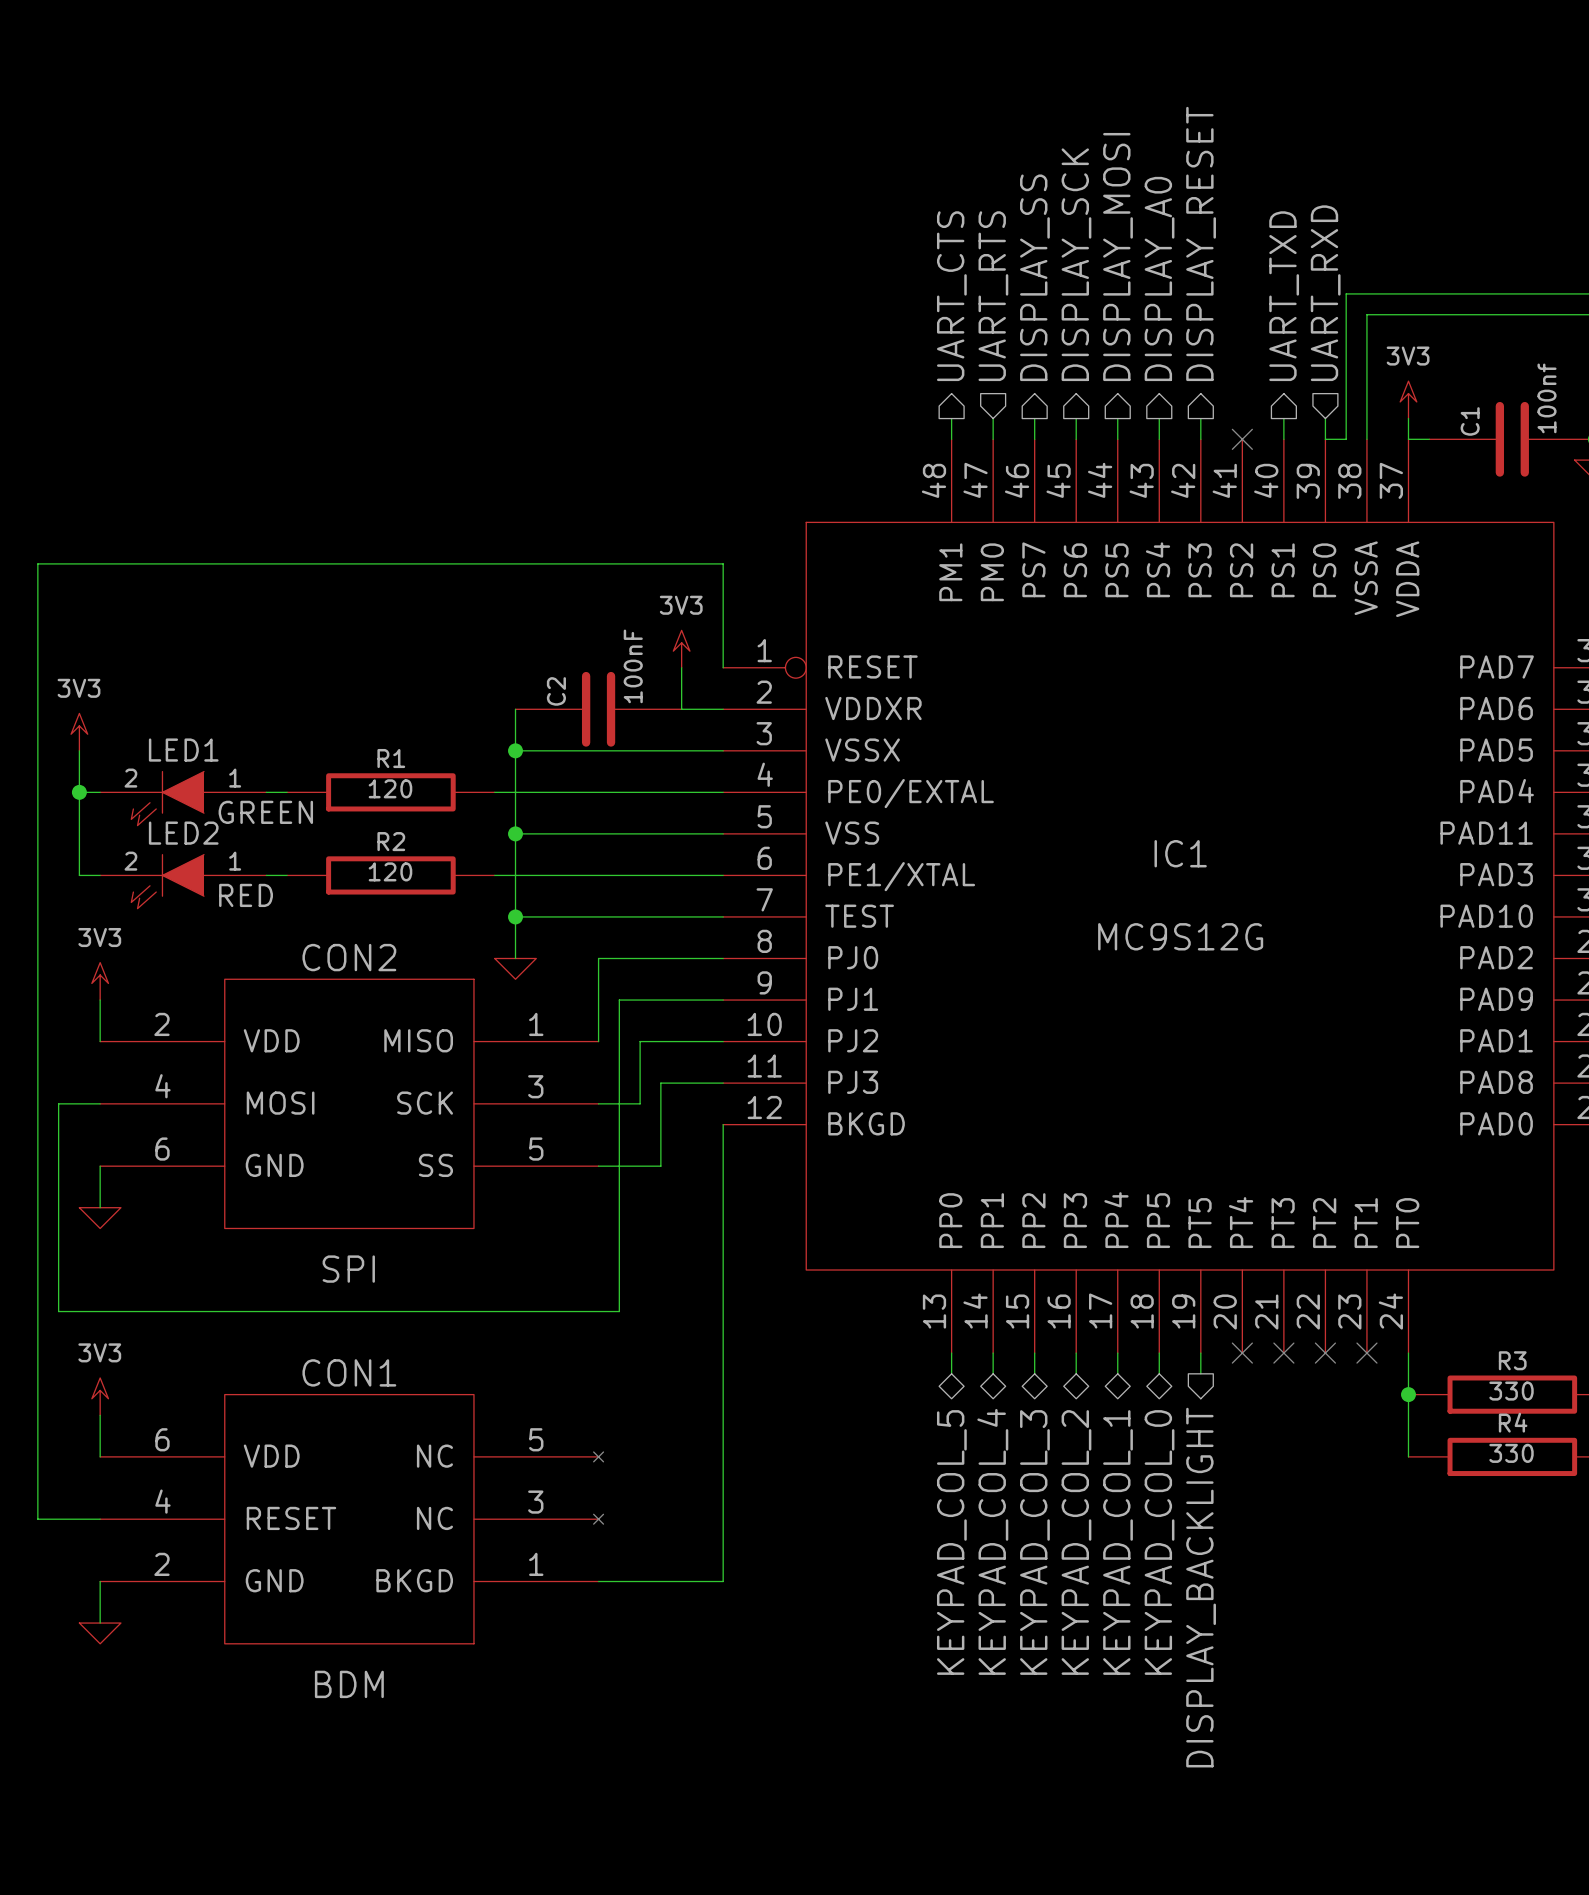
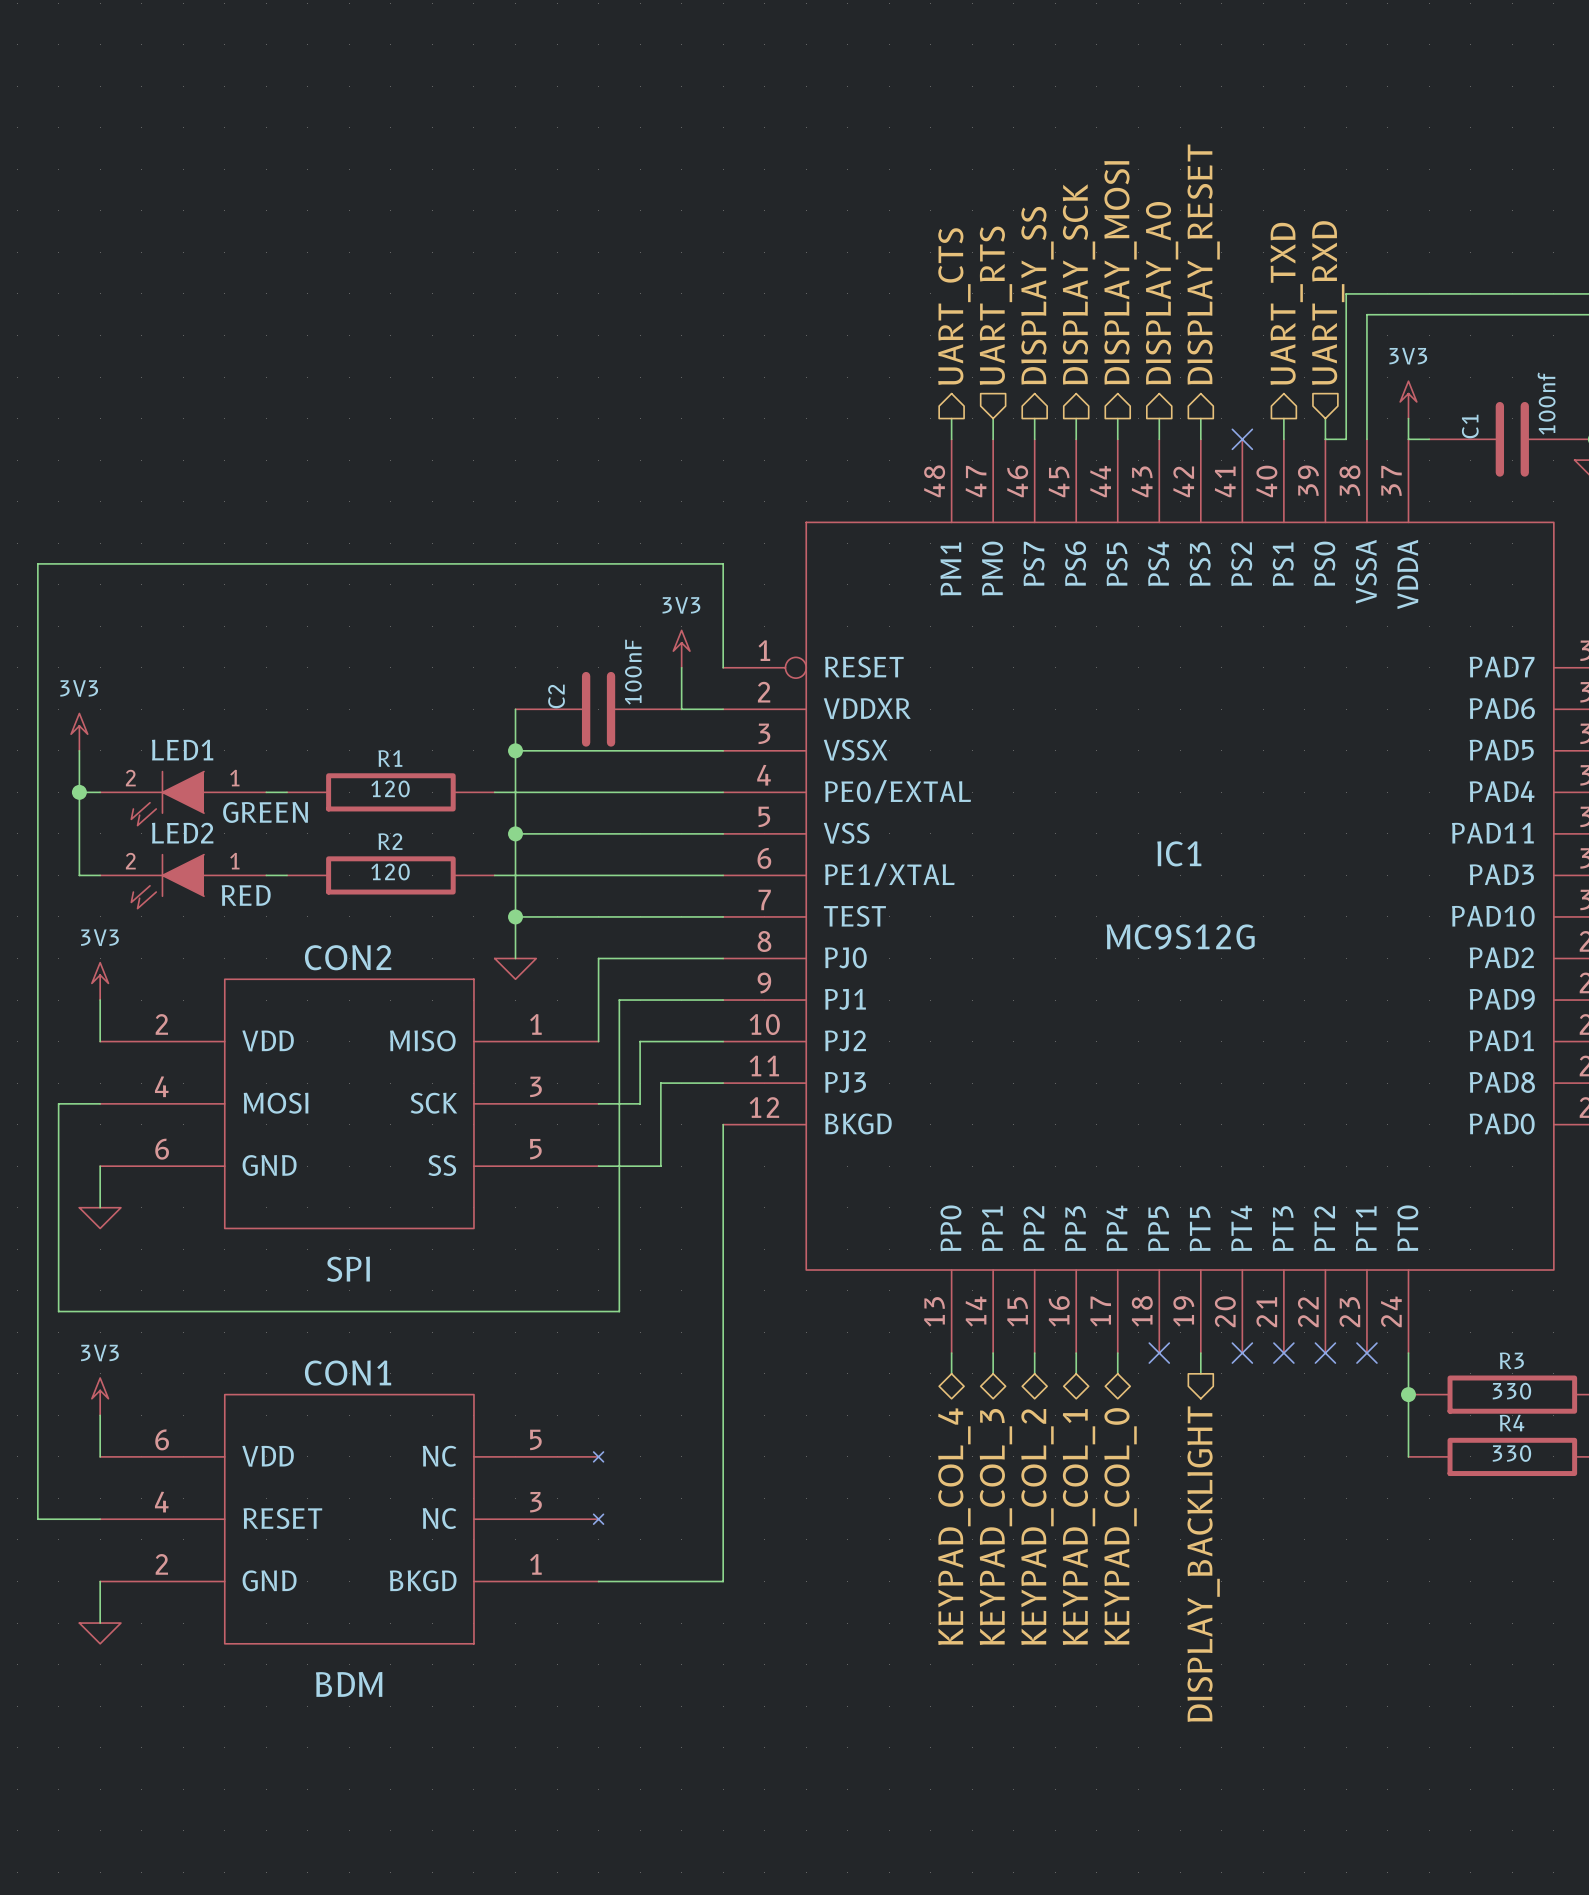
wire: (1159, 1353) (1159, 1373) -> none
no-connect mark: none -> (1159, 1353)
hierarchical label: KEYPAD_COL_4 (992, 1541) -> KEYPAD_COL_3 (995, 1526)
hierarchical label: KEYPAD_COL_5 (951, 1542) -> KEYPAD_COL_4 (954, 1526)
hierarchical label: KEYPAD_COL_3 (1034, 1542) -> KEYPAD_COL_2 (1037, 1527)
hierarchical label: KEYPAD_COL_2 (1076, 1542) -> KEYPAD_COL_1 (1079, 1527)
hierarchical label: KEYPAD_COL_1 (1118, 1542) -> KEYPAD_COL_0 (1120, 1526)
hierarchical label: KEYPAD_COL_0 (1159, 1542) -> none

